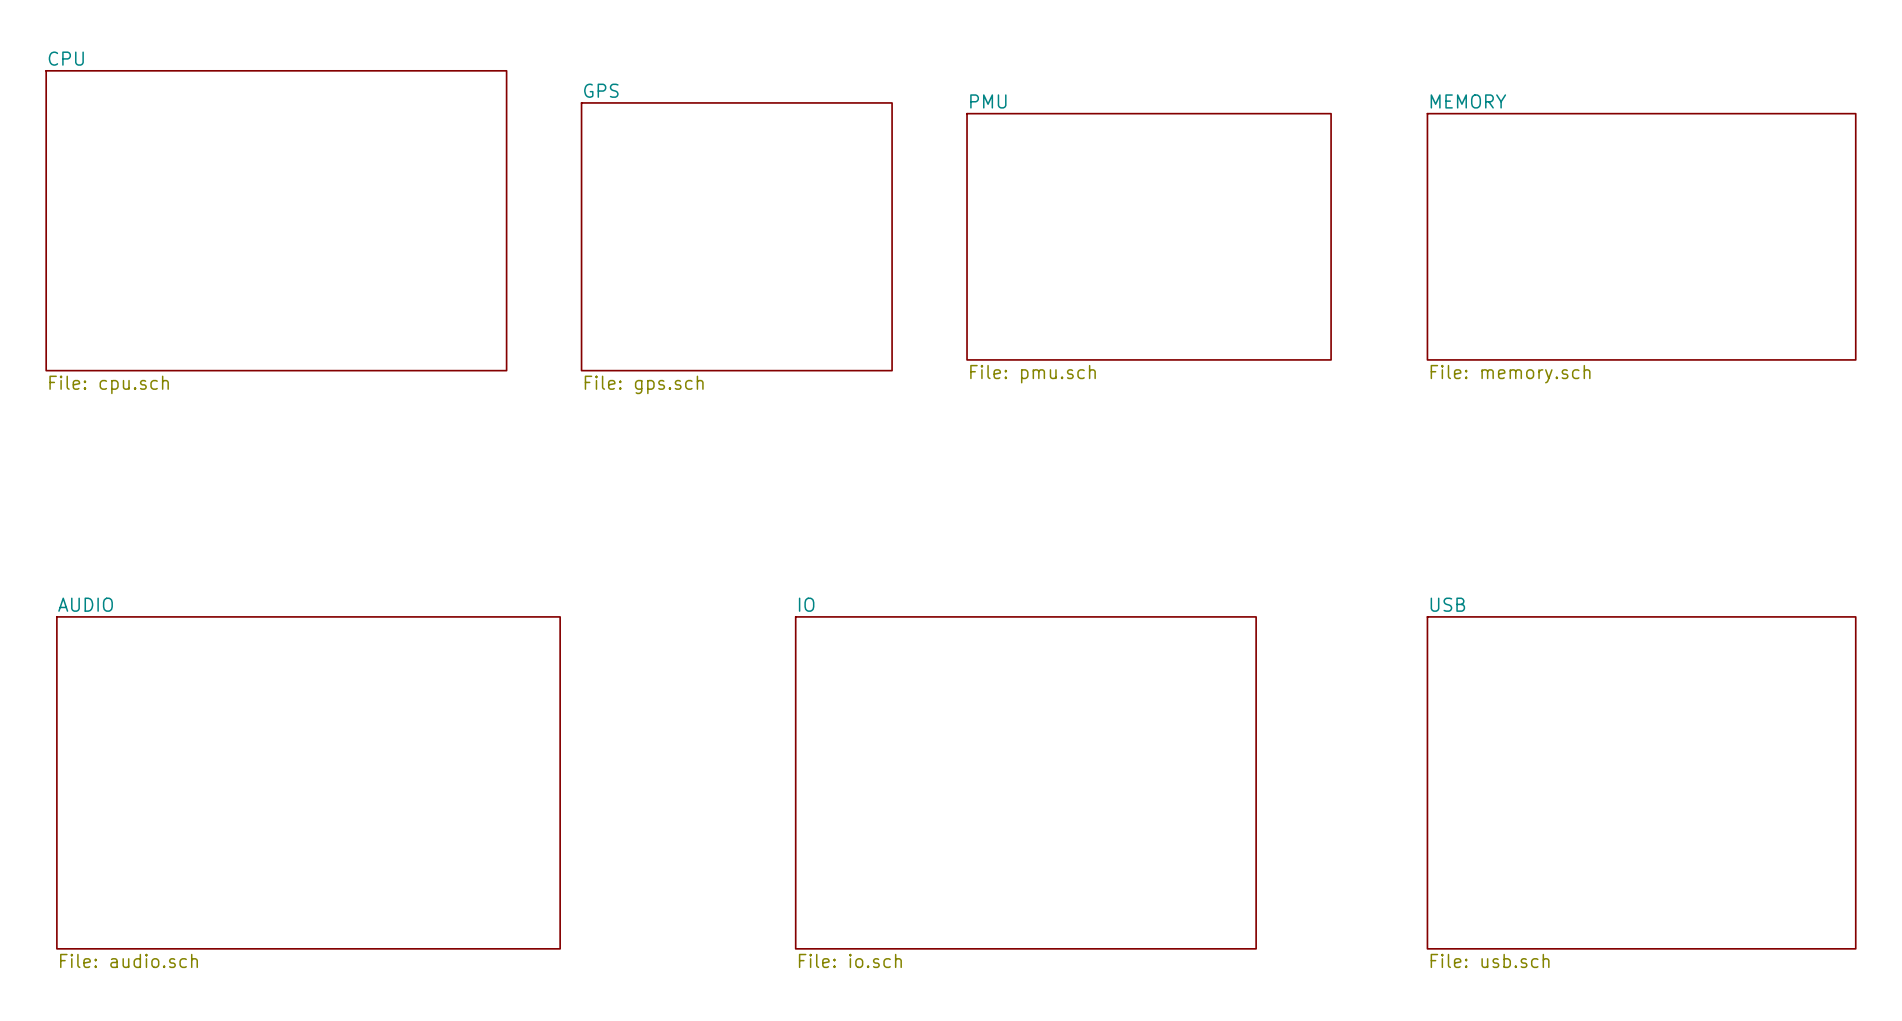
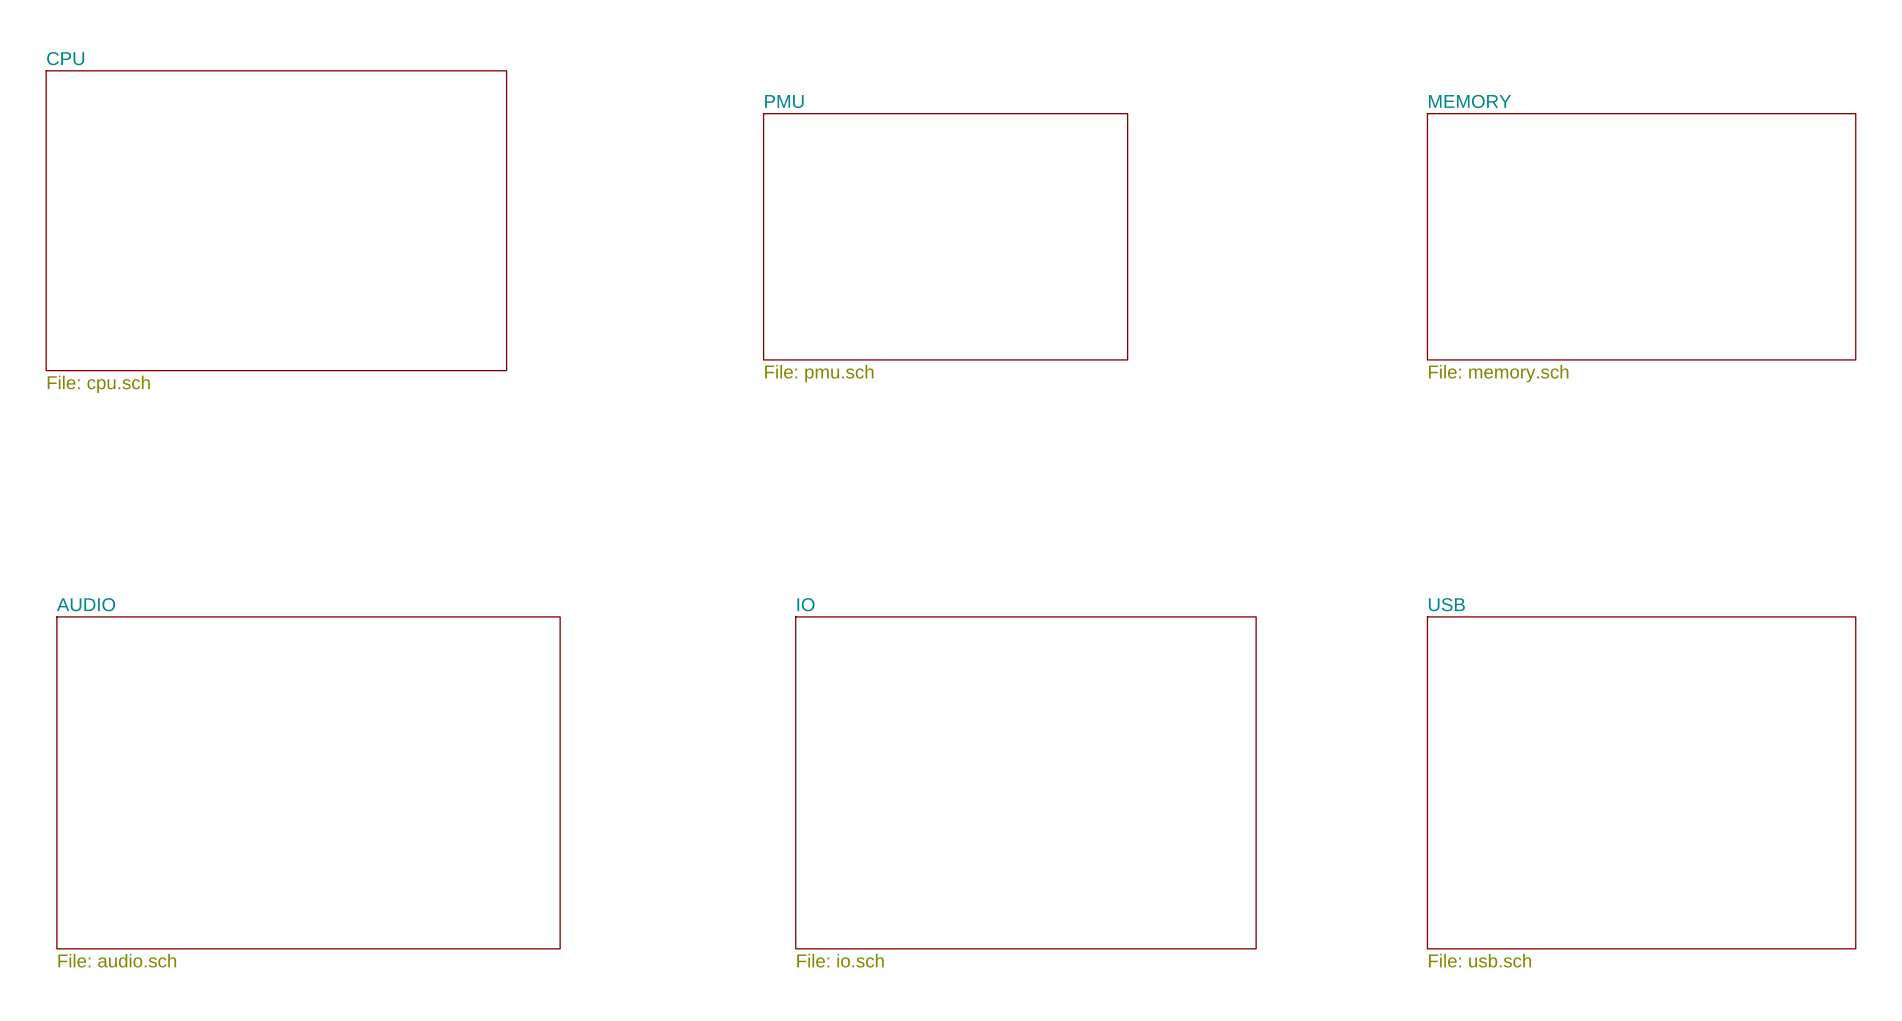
sheet GPS: File: gps.sch (736, 236) -> none
sheet PMU position: (1149, 236) -> (945, 236)

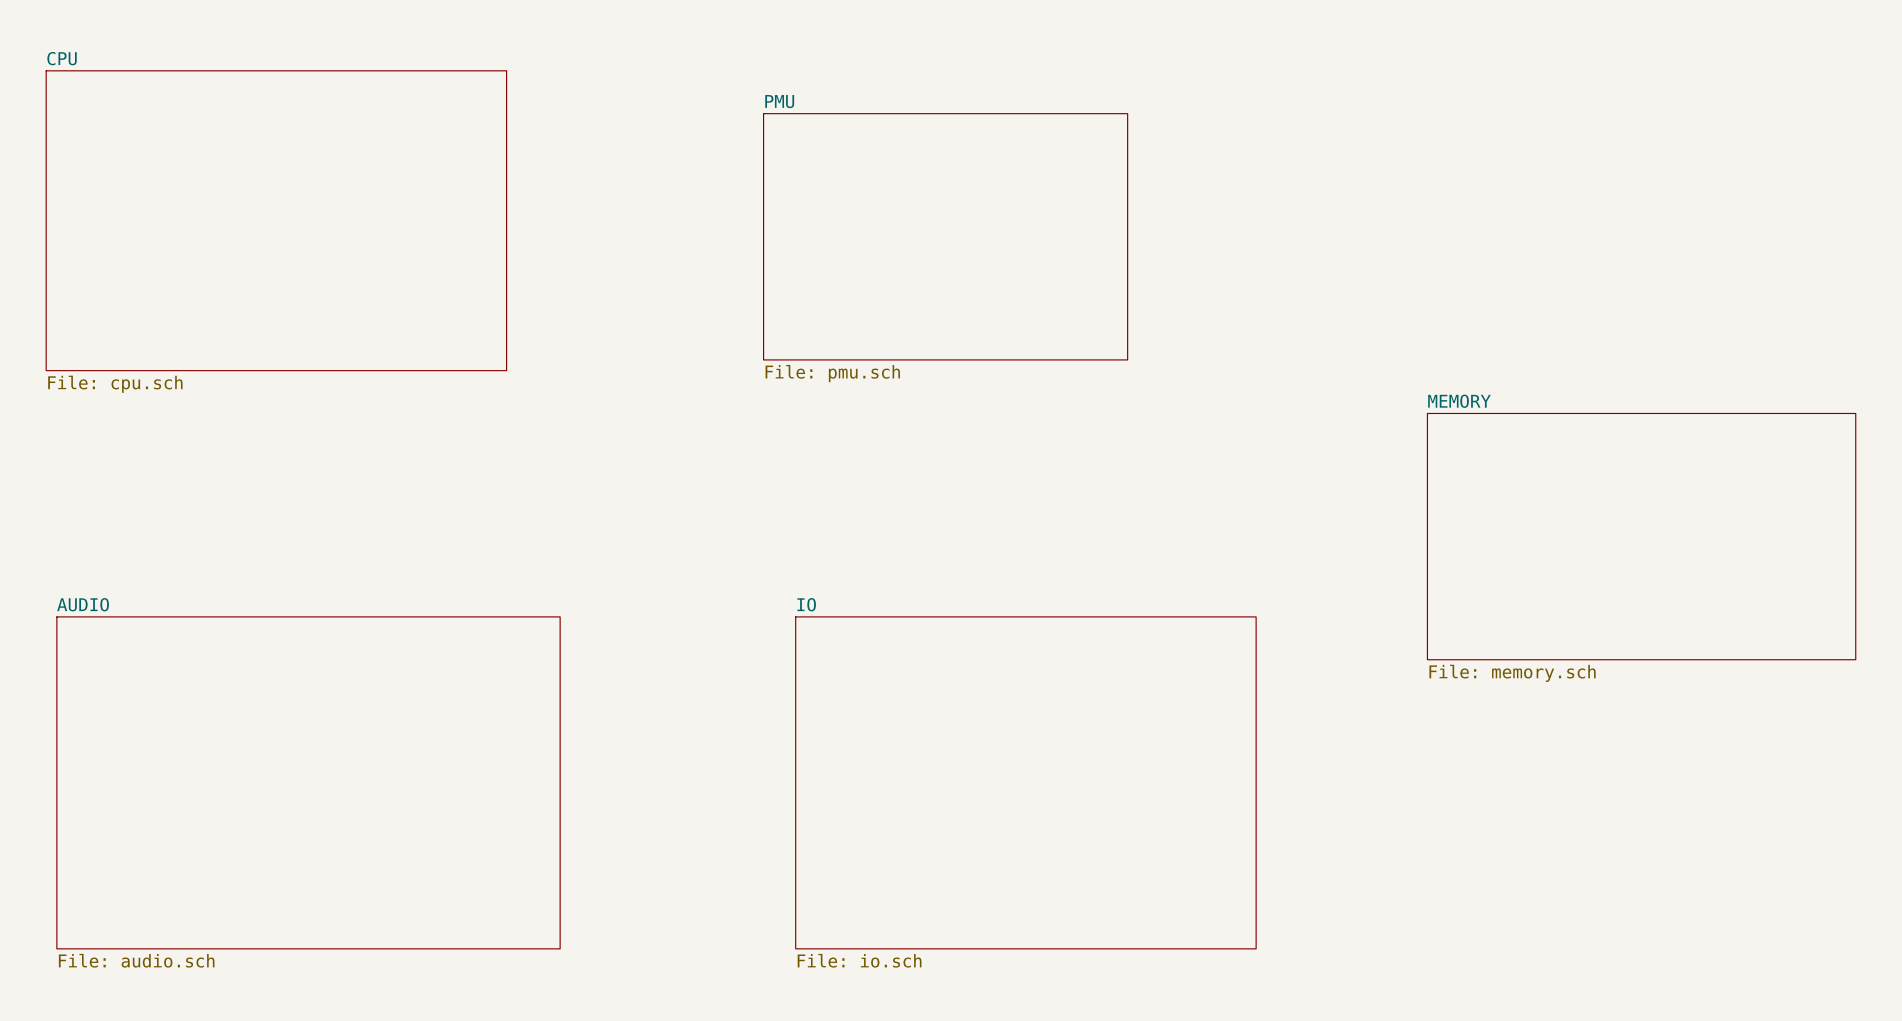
sheet MEMORY: File: memory.sch (1641, 236) -> none
sheet MEMORY: none -> File: memory.sch (1641, 536)
sheet USB: File: usb.sch (1641, 782) -> none

